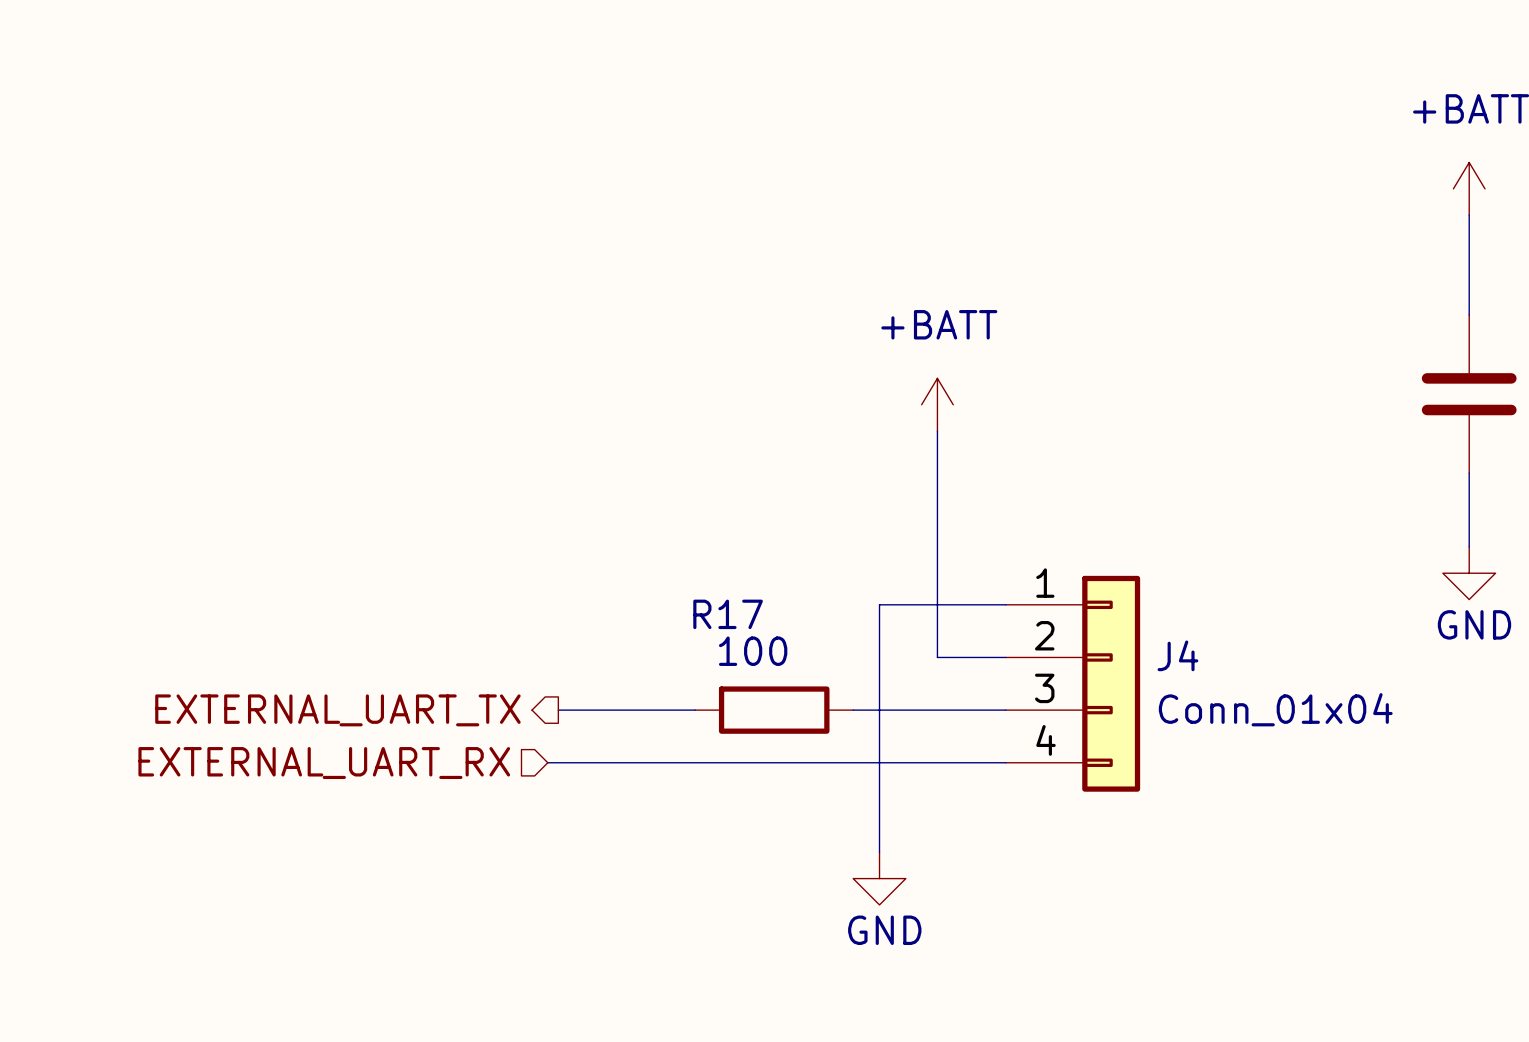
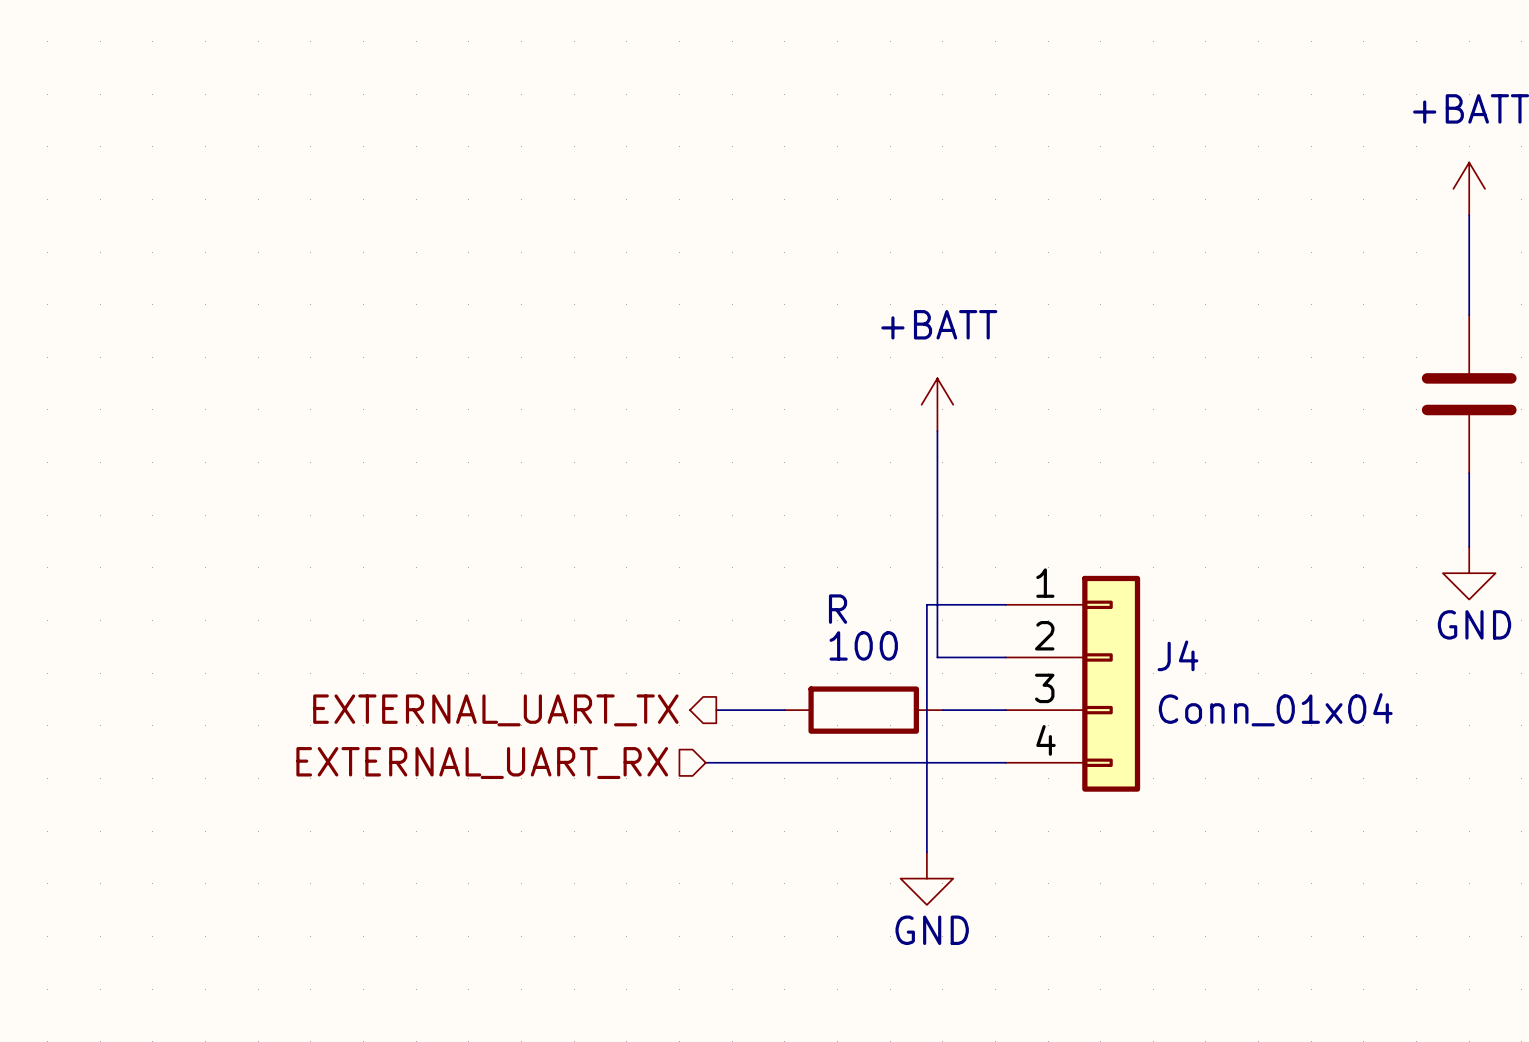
wire: (926, 604) (879, 604) (879, 852) -> (926, 604) (926, 852)
hierarchical label position: EXTERNAL_UART_TX (337, 710) -> EXTERNAL_UART_TX (495, 710)
wire: (558, 710) (695, 710) -> none
wire: none -> (716, 710) (784, 710)
R17: 100 (774, 710) -> none
wire: (853, 710) (942, 710) -> none
R: none -> 100 (863, 710)
wire: (547, 762) (705, 762) -> none
hierarchical label position: EXTERNAL_UART_RX (324, 763) -> EXTERNAL_UART_RX (482, 763)
power symbol position: GND (879, 878) -> GND (926, 878)

